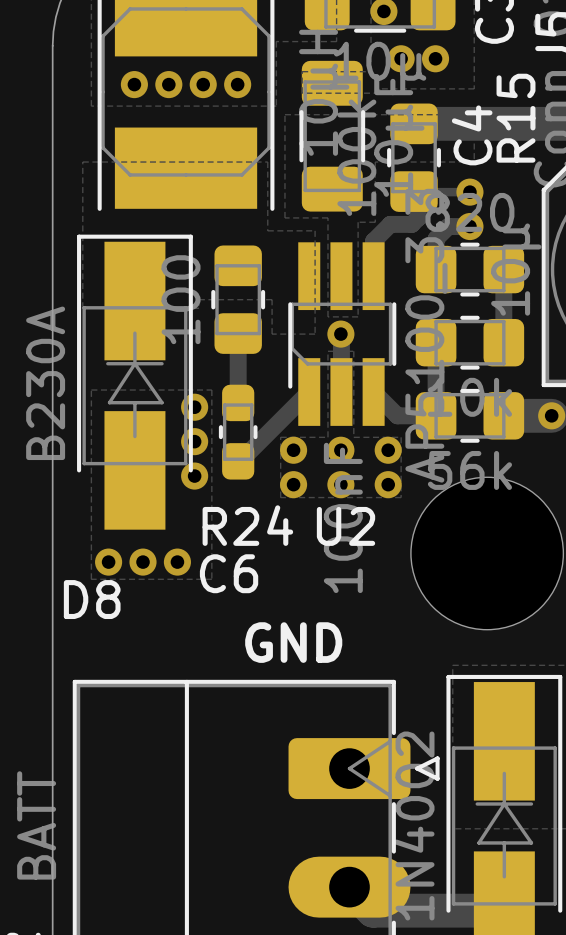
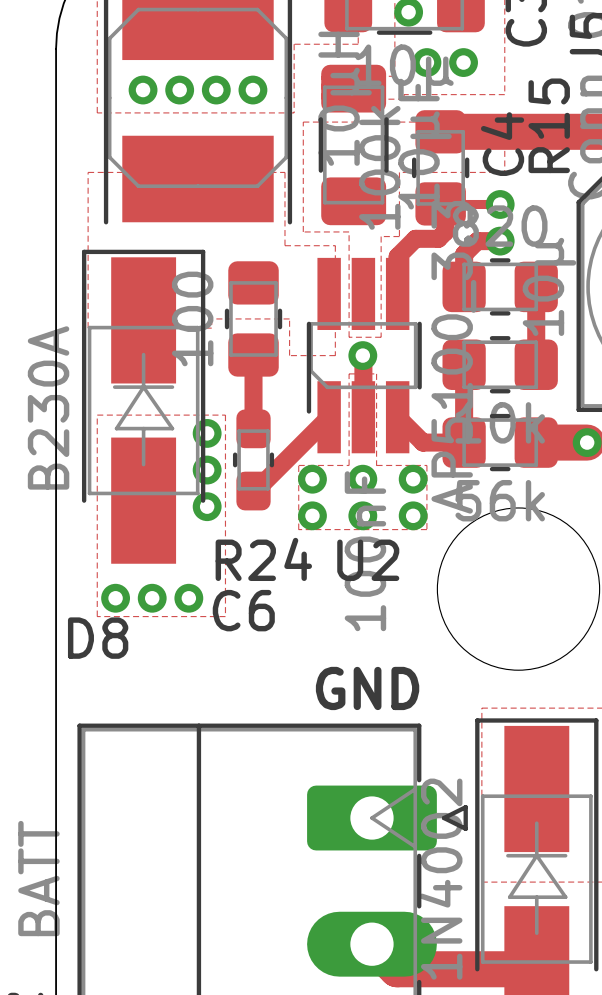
text position: GND (293, 642) -> GND (367, 688)

